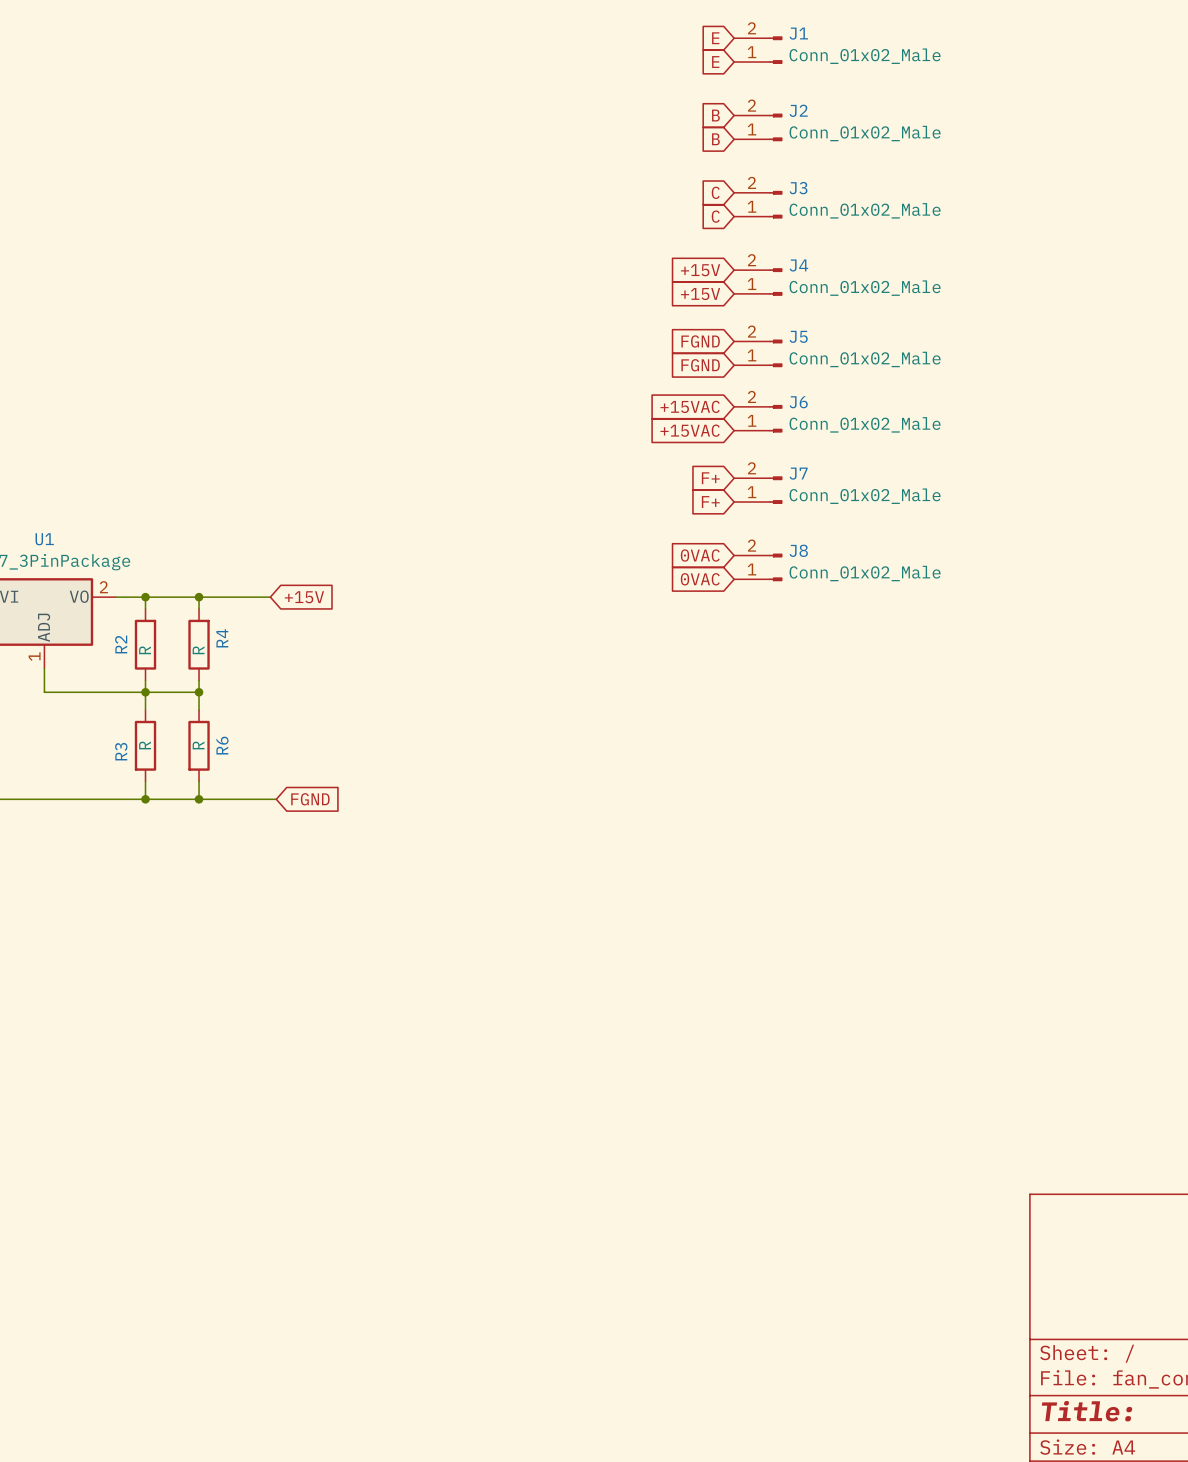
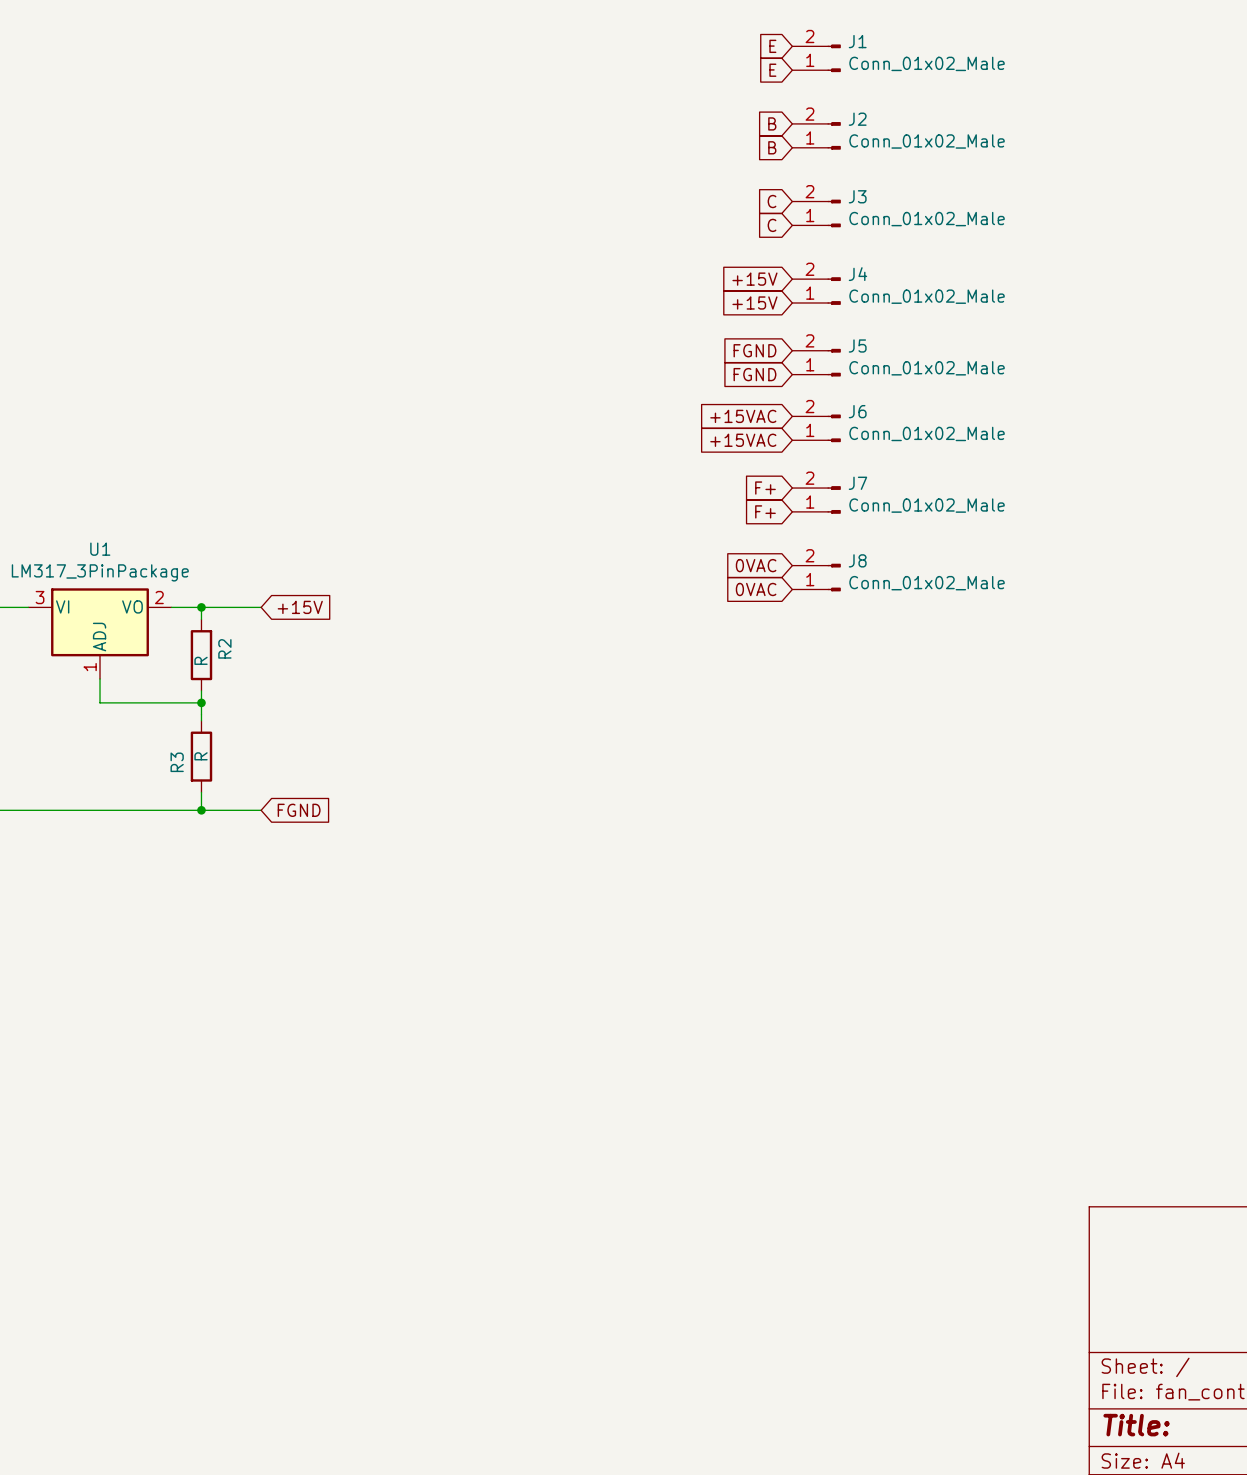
wire: (199, 597) (199, 609) -> none
junction: (199, 597) -> none
wire: (204, 597) (270, 597) -> none
global label position: +15V (304, 597) -> +15V (300, 607)
R2 name position: R2 (121, 644) -> R2 (224, 648)
R4: R (199, 644) -> none
wire: (199, 680) (199, 710) -> none
wire: (145, 692) (199, 692) -> none
junction: (199, 692) -> none
R6: R (199, 745) -> none
wire: (199, 781) (199, 799) -> none
junction: (199, 799) -> none
wire: (204, 799) (276, 799) -> none
global label position: FGND (310, 799) -> FGND (299, 810)

